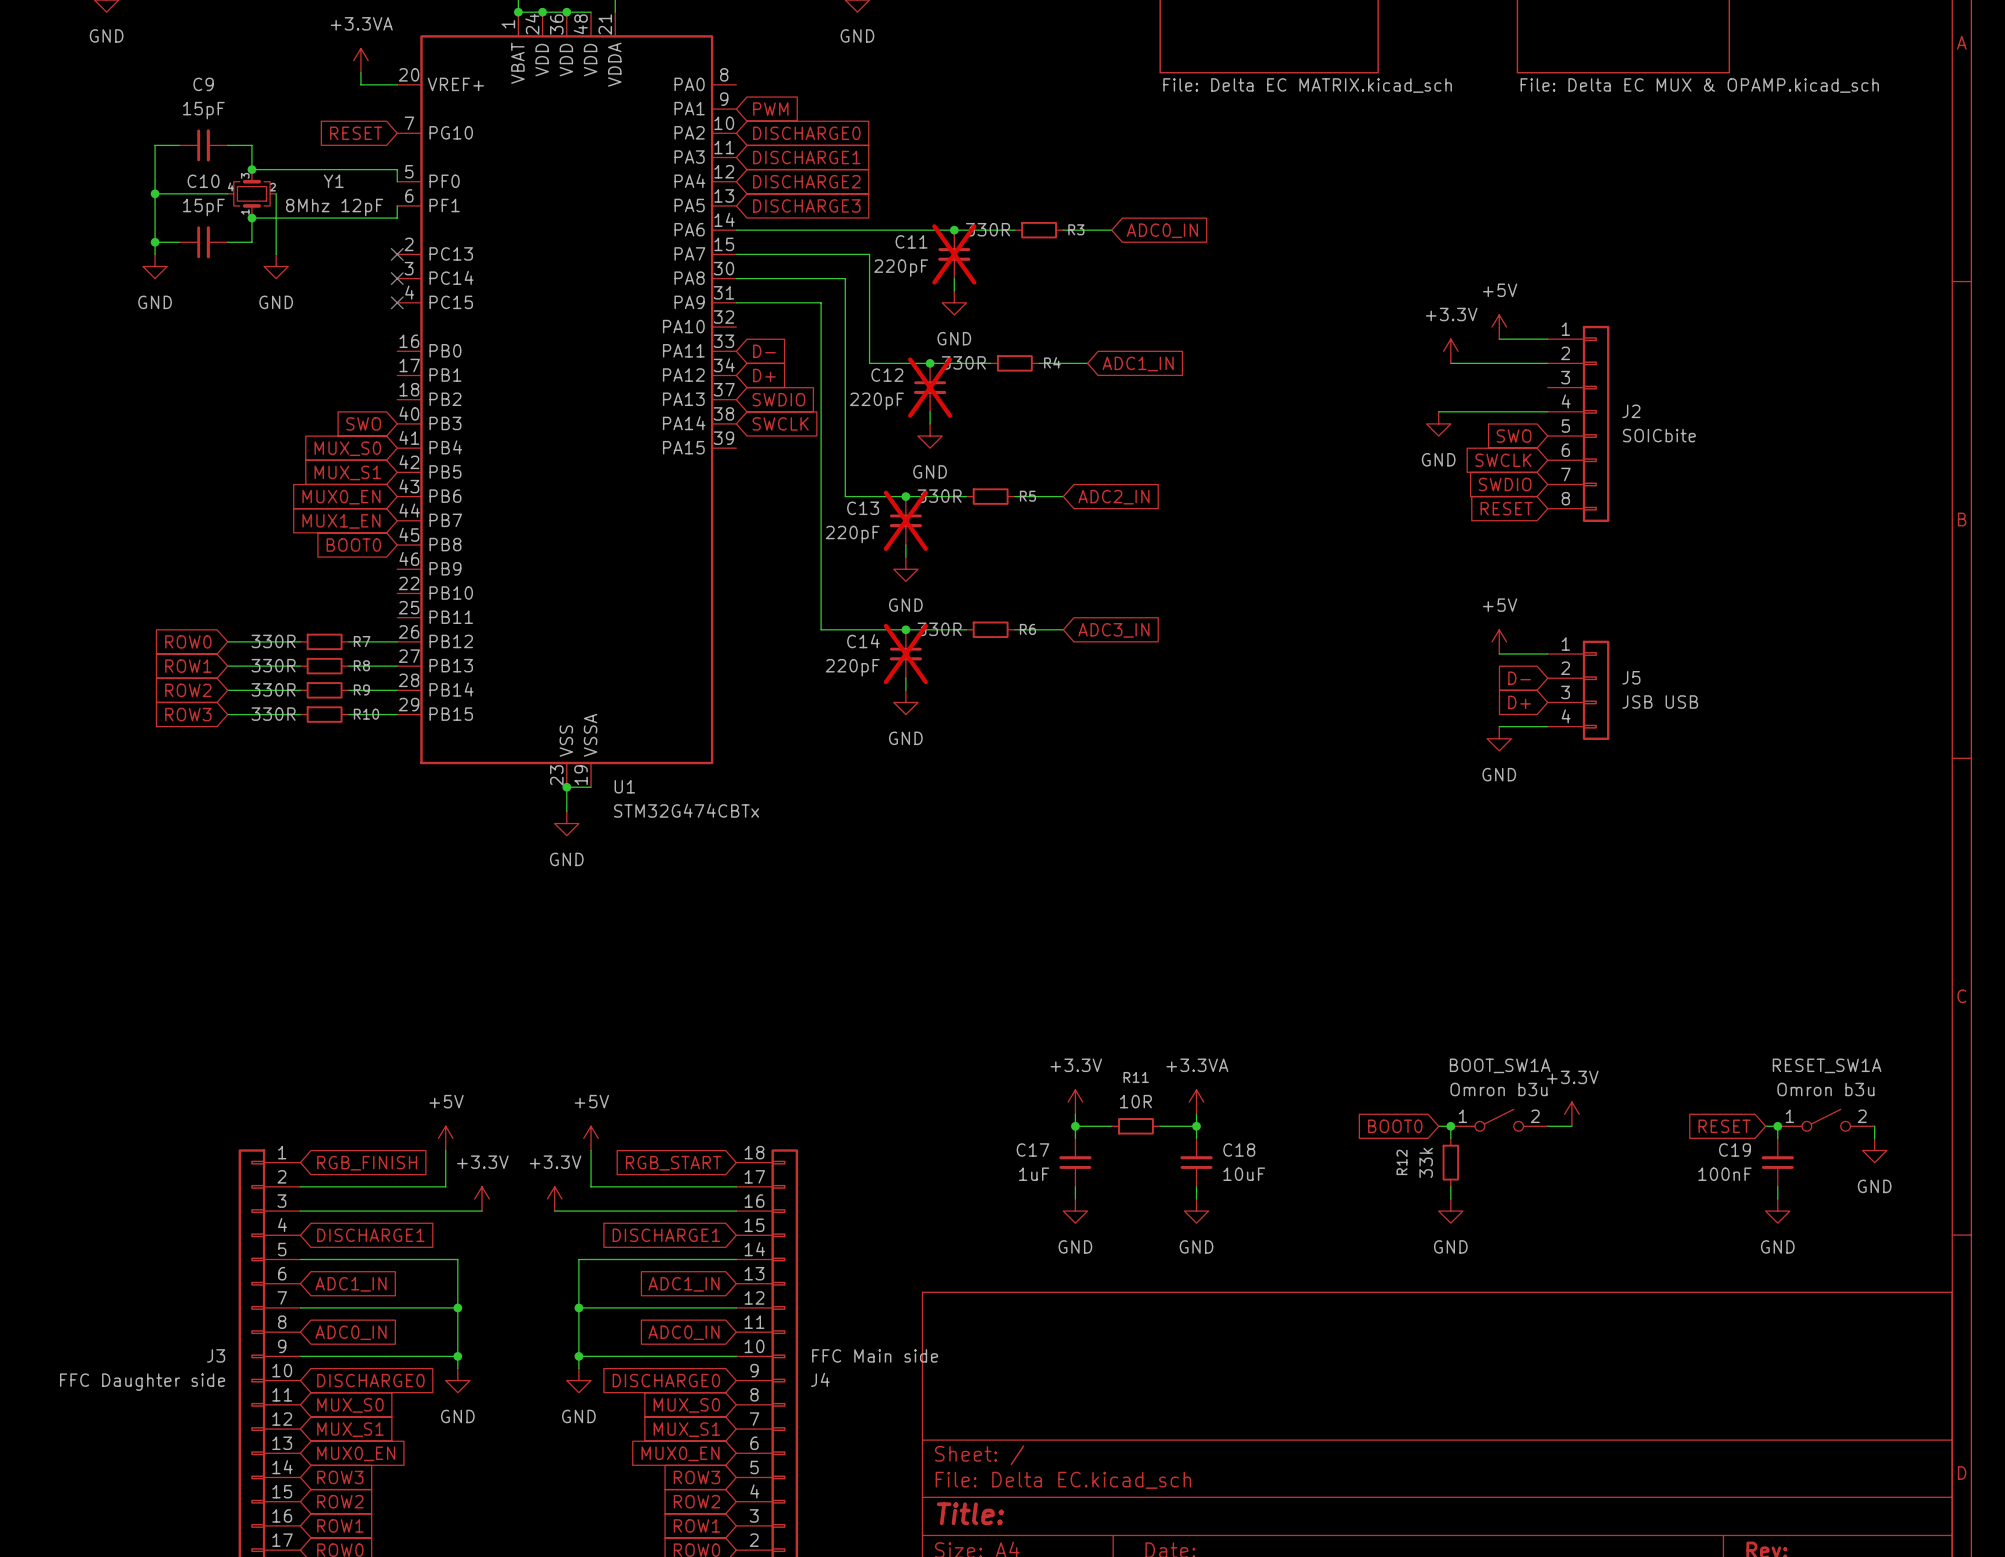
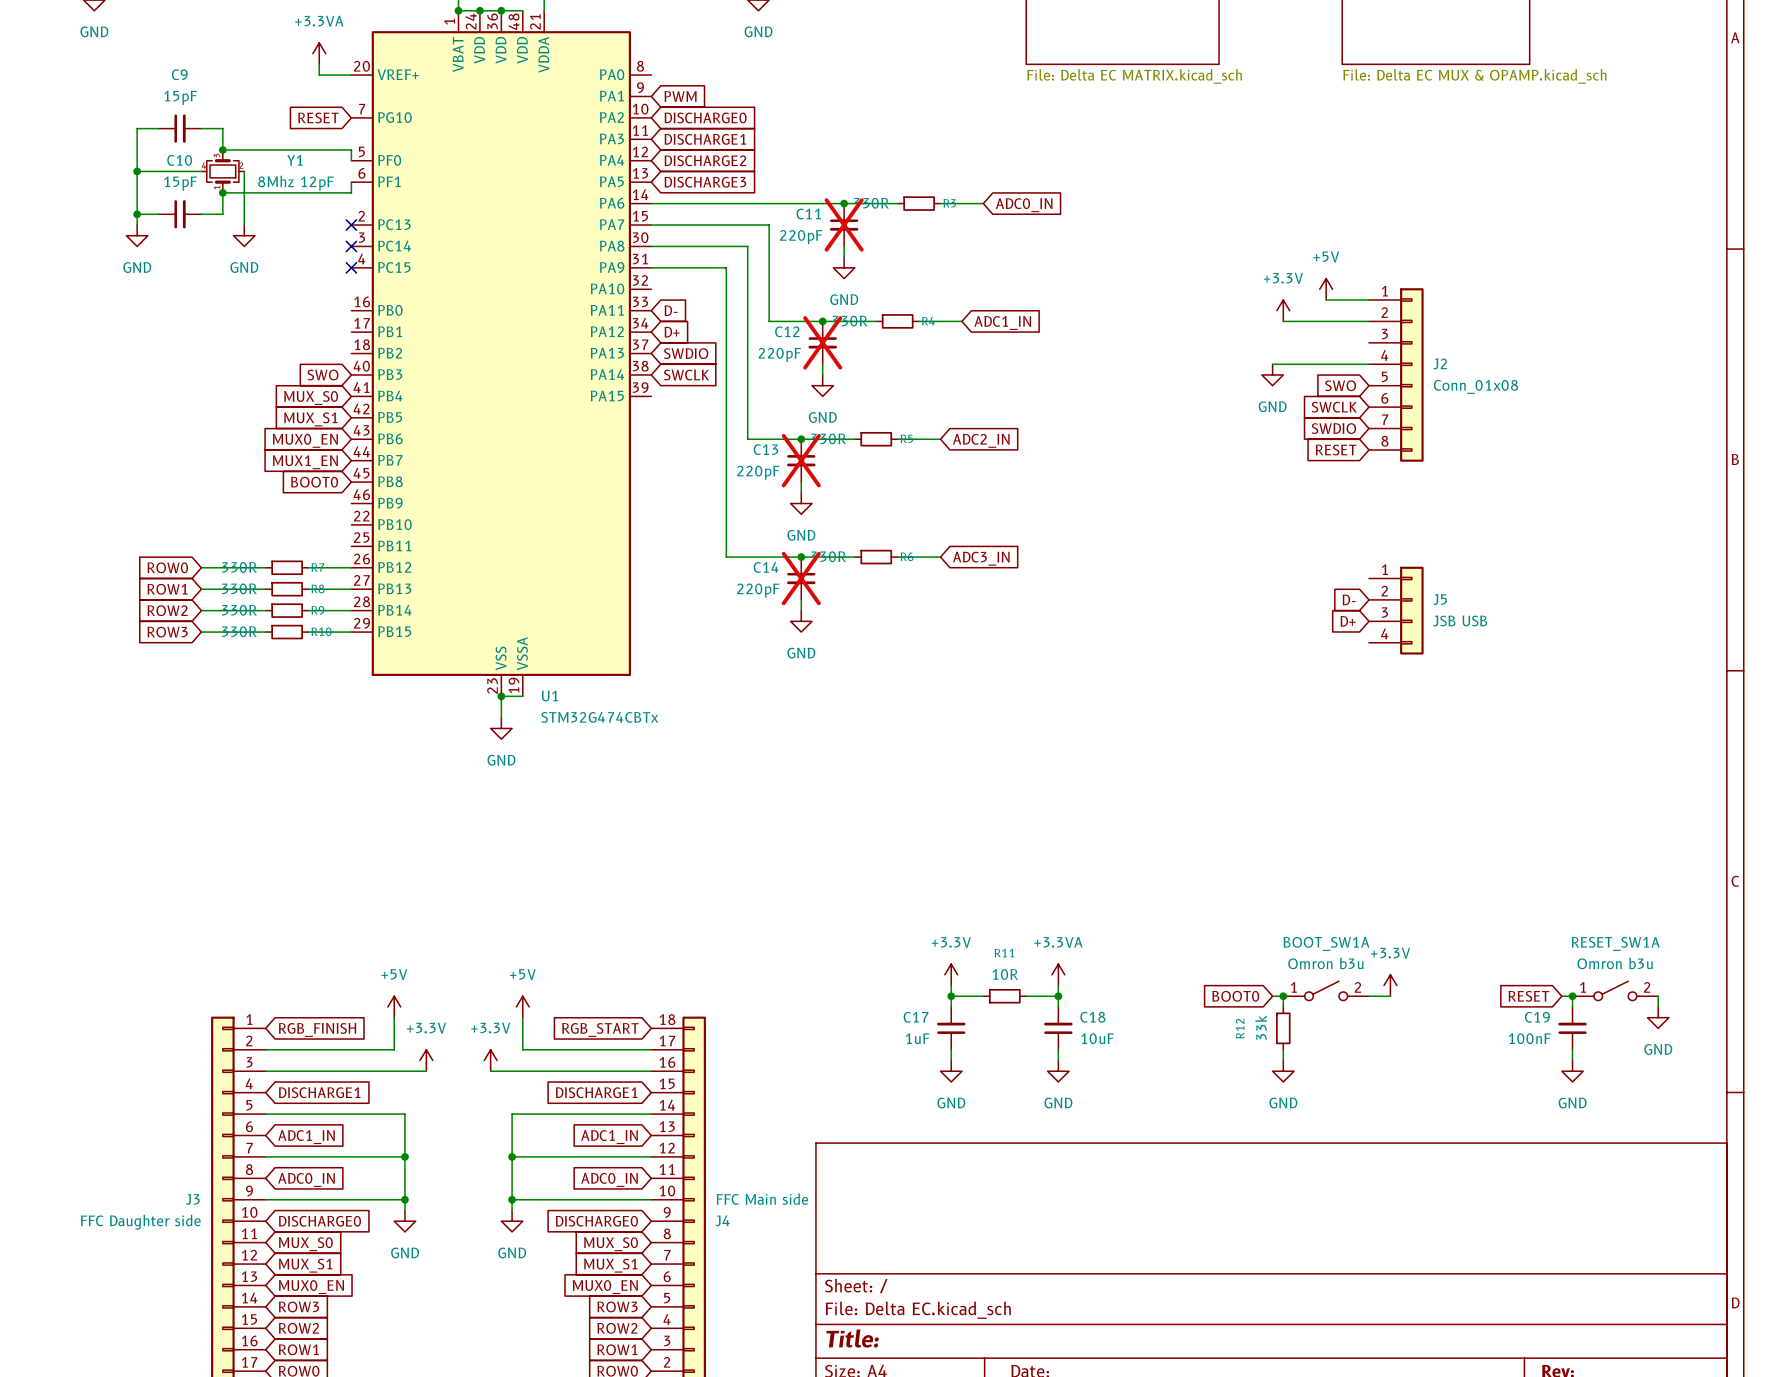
J2 value: SOICbite (1659, 435) -> Conn_01x08 (1475, 386)
power symbol: +5V (1499, 641) -> none
wire: (1499, 654) (1547, 654) -> none
wire: (1499, 726) (1547, 726) -> none
power symbol: GND (1499, 738) -> none

